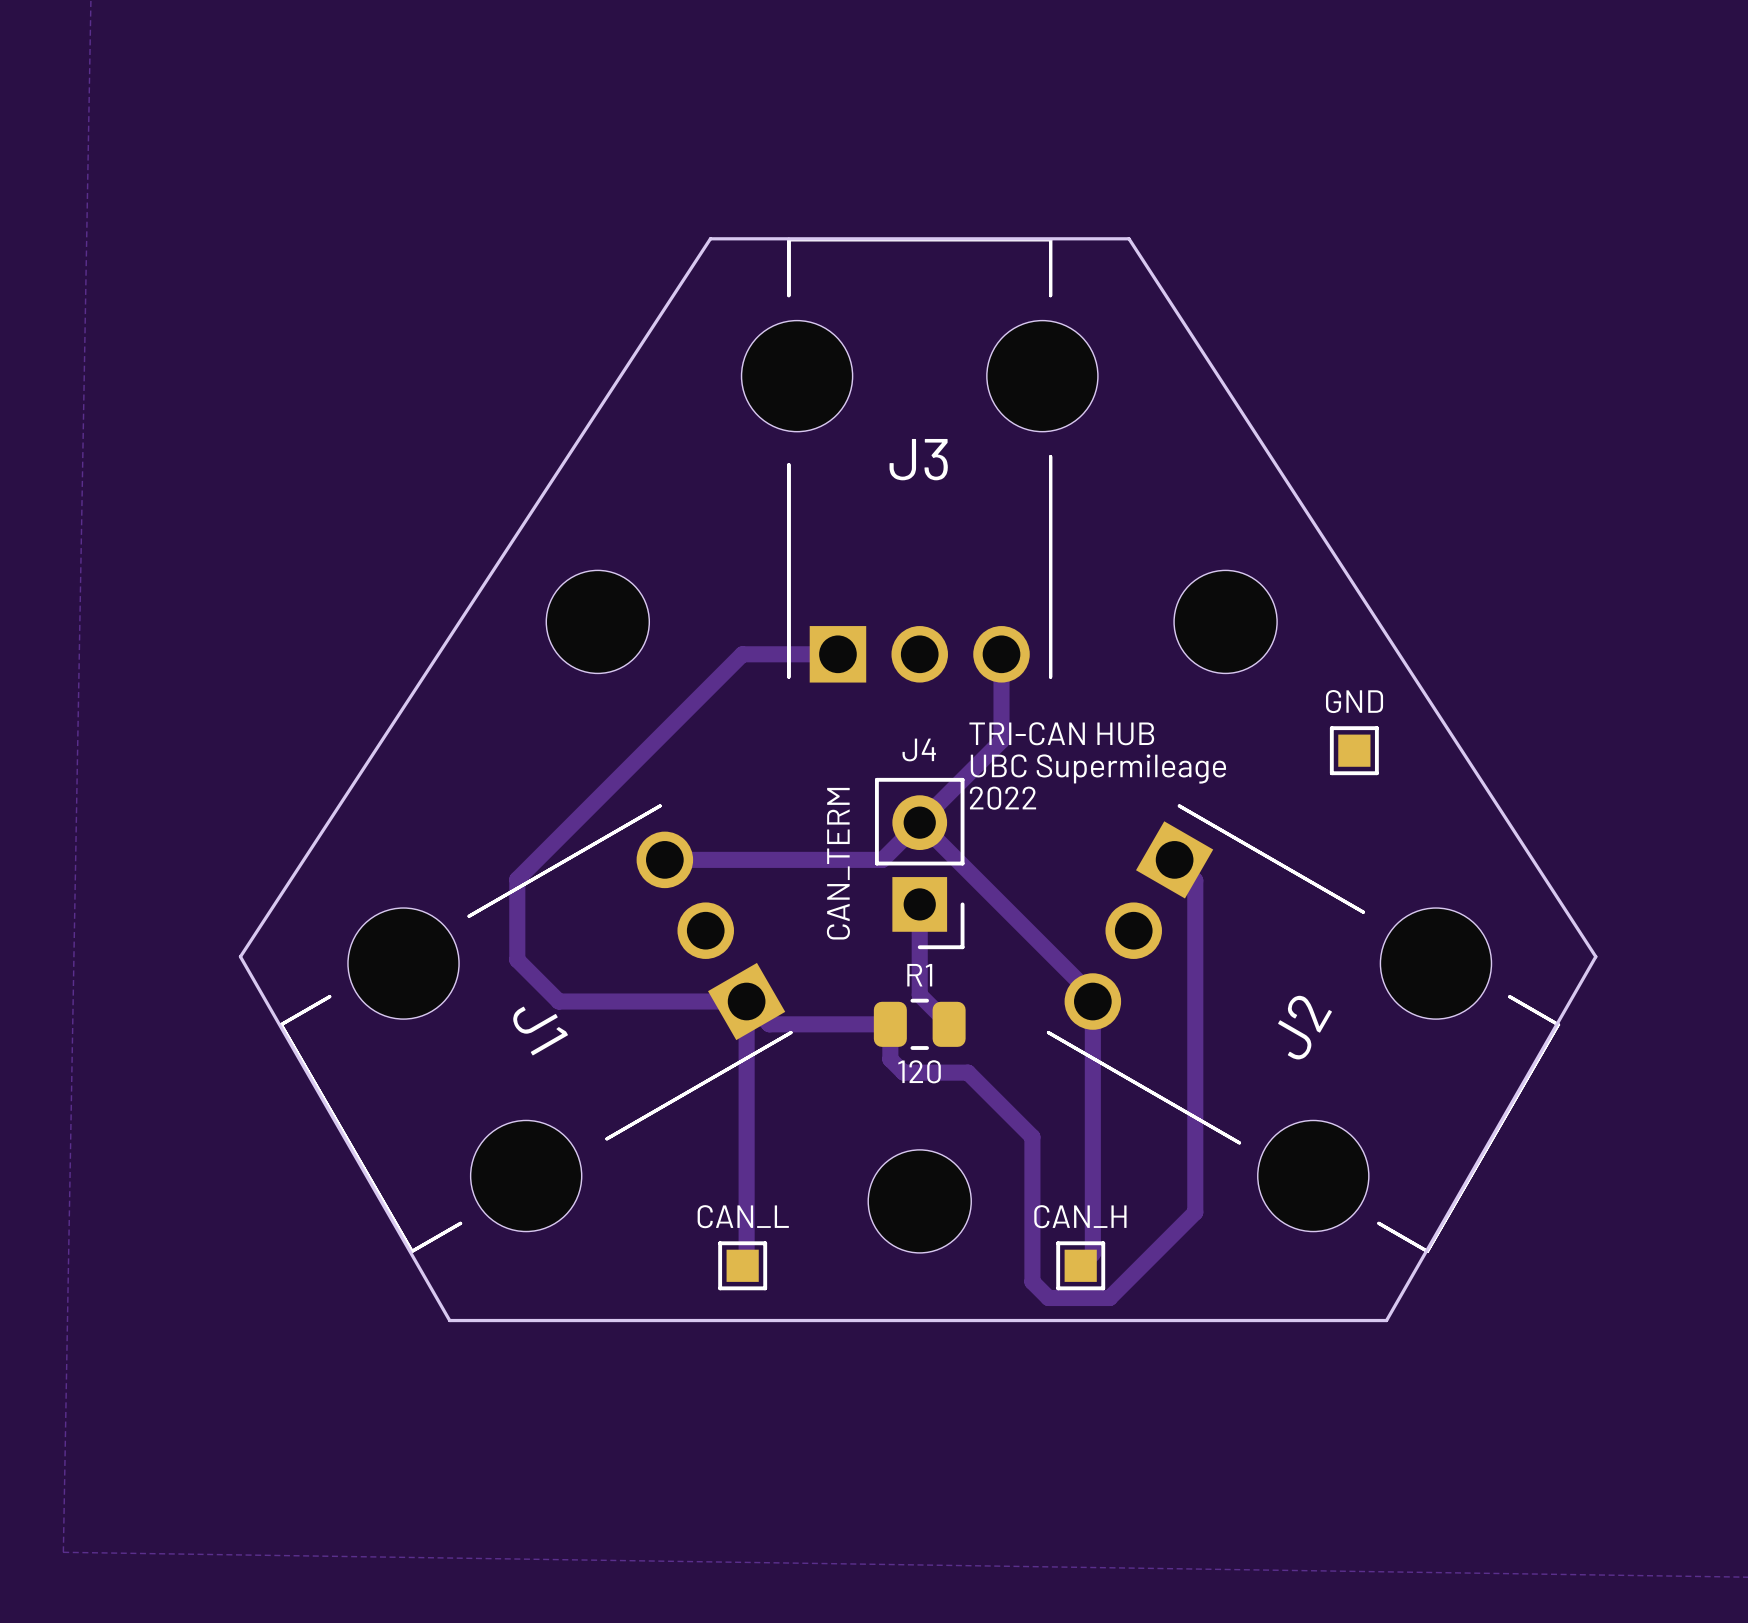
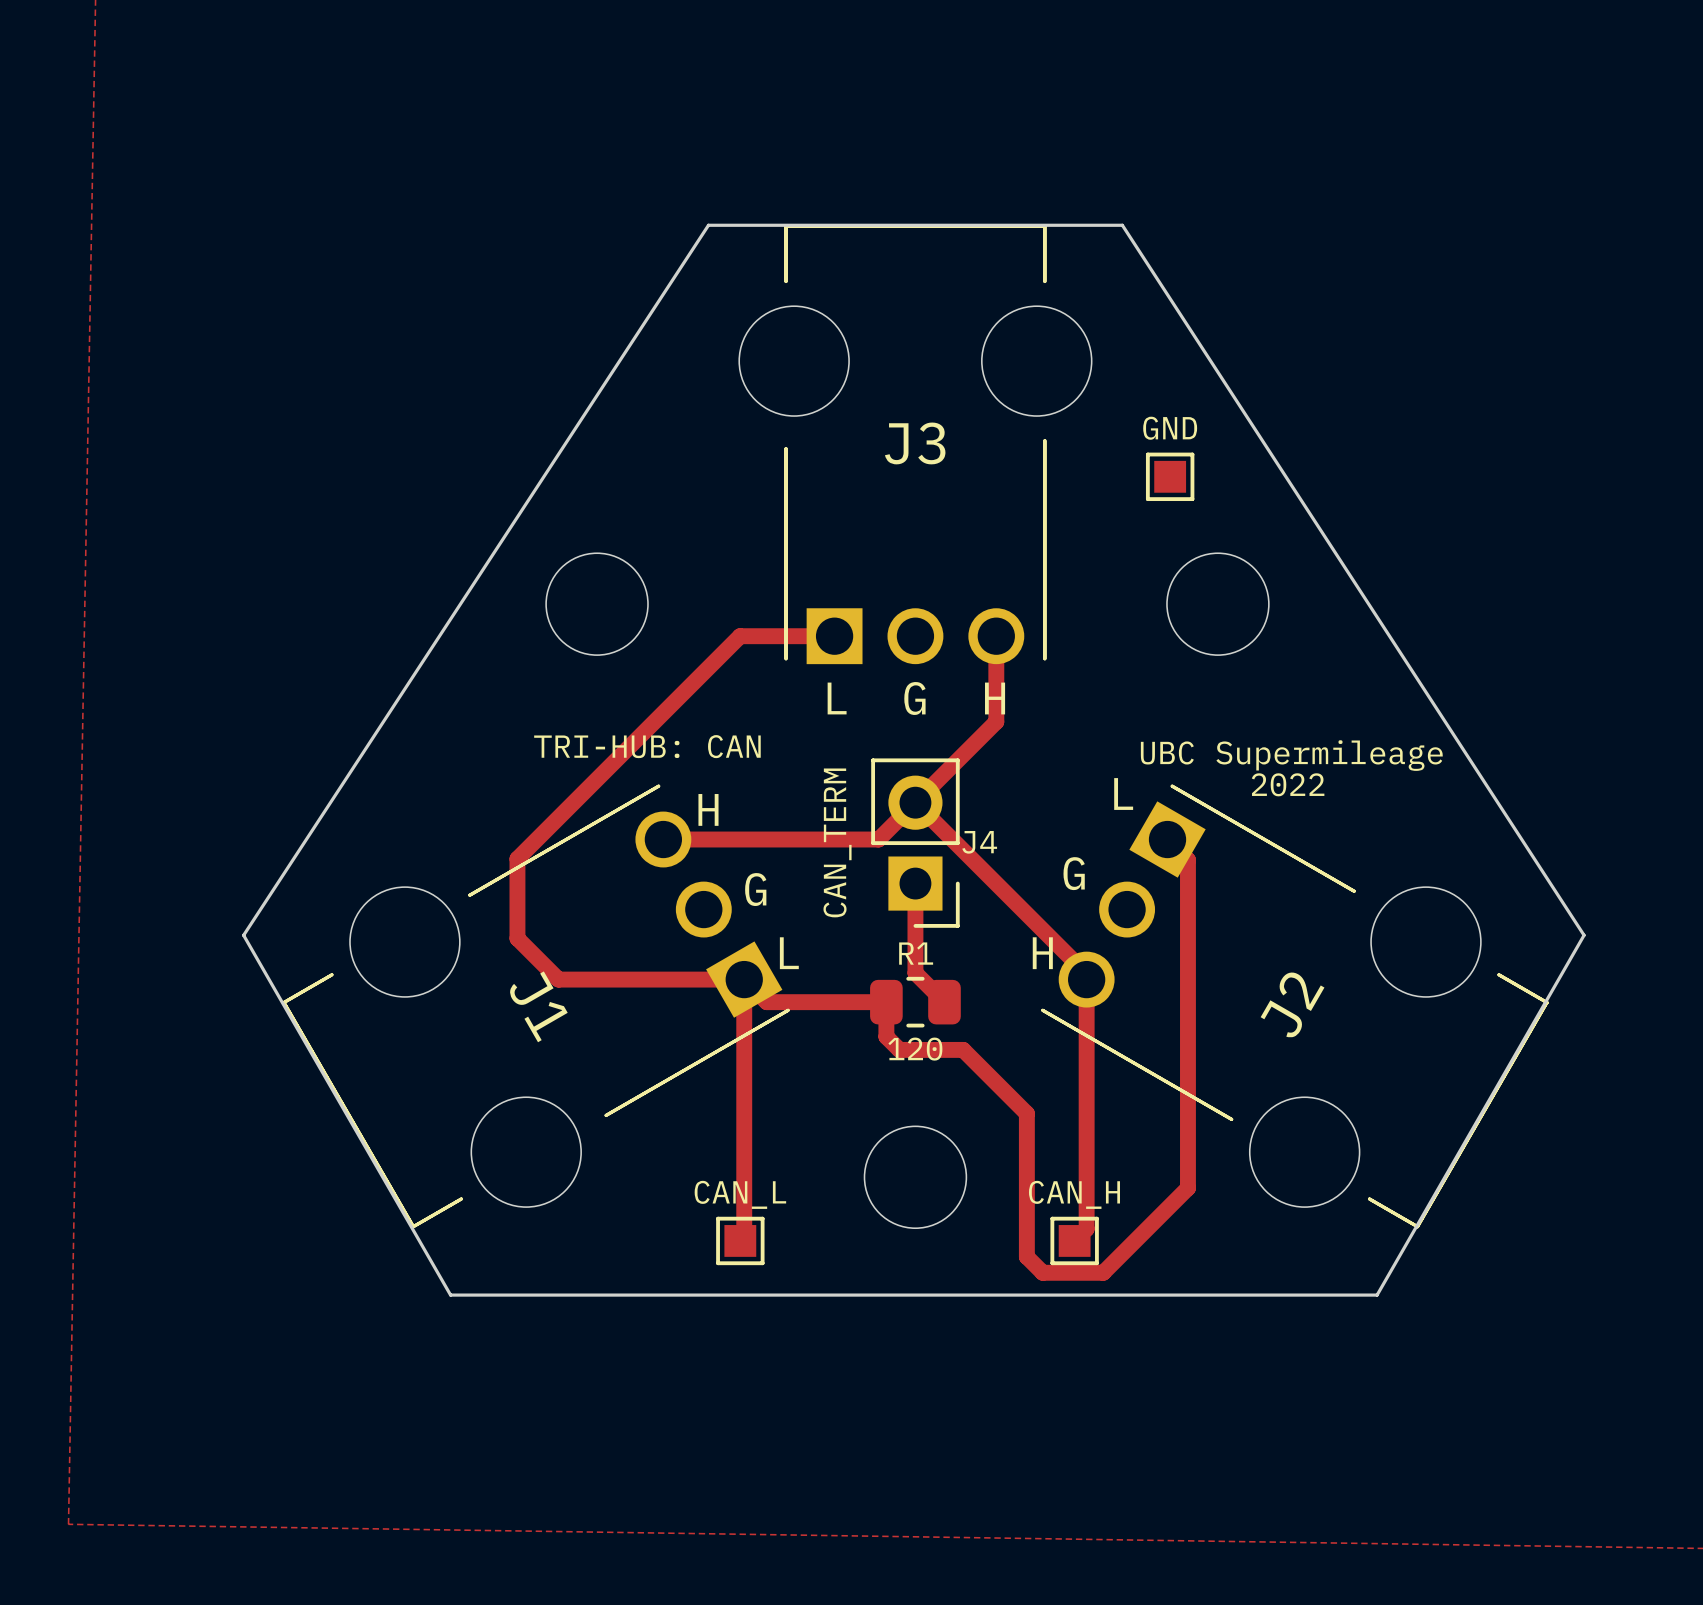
text: none -> L (837, 698)
text: none -> G (914, 698)
text: none -> H (995, 698)
text: TRI-CAN HUB (1061, 733) -> none
J4 name position: J4 (919, 749) -> J4 (979, 842)
part position: (1354, 750) -> (1170, 476)
text: none -> TRI-HUB: CAN (647, 746)
text position: UBC Supermileage (1098, 768) -> UBC Supermileage (1291, 755)
text position: 2022 (1002, 798) -> 2022 (1288, 784)
text: none -> L (1123, 794)
text: none -> H (708, 809)
text: none -> G (1074, 873)
text: none -> G (755, 889)
text: none -> L (789, 953)
text: none -> H (1042, 953)

